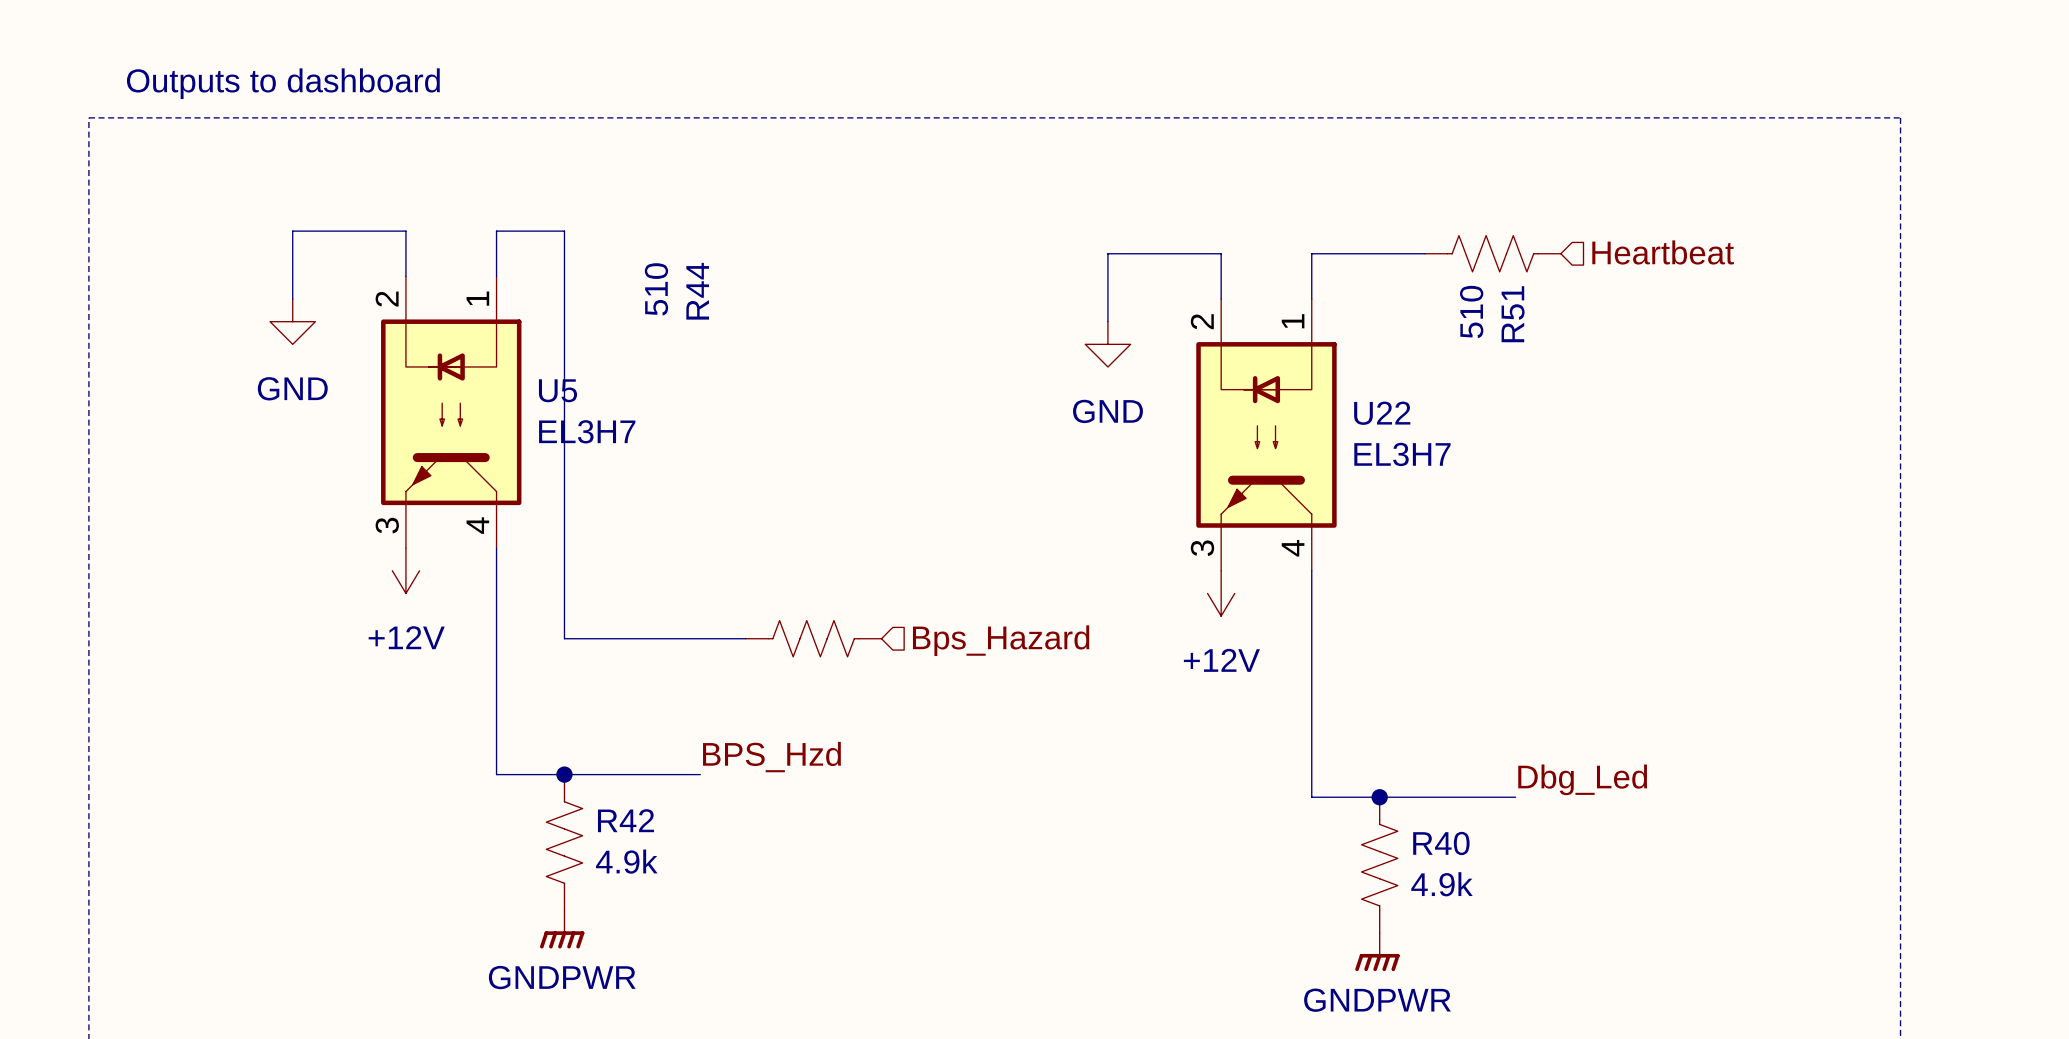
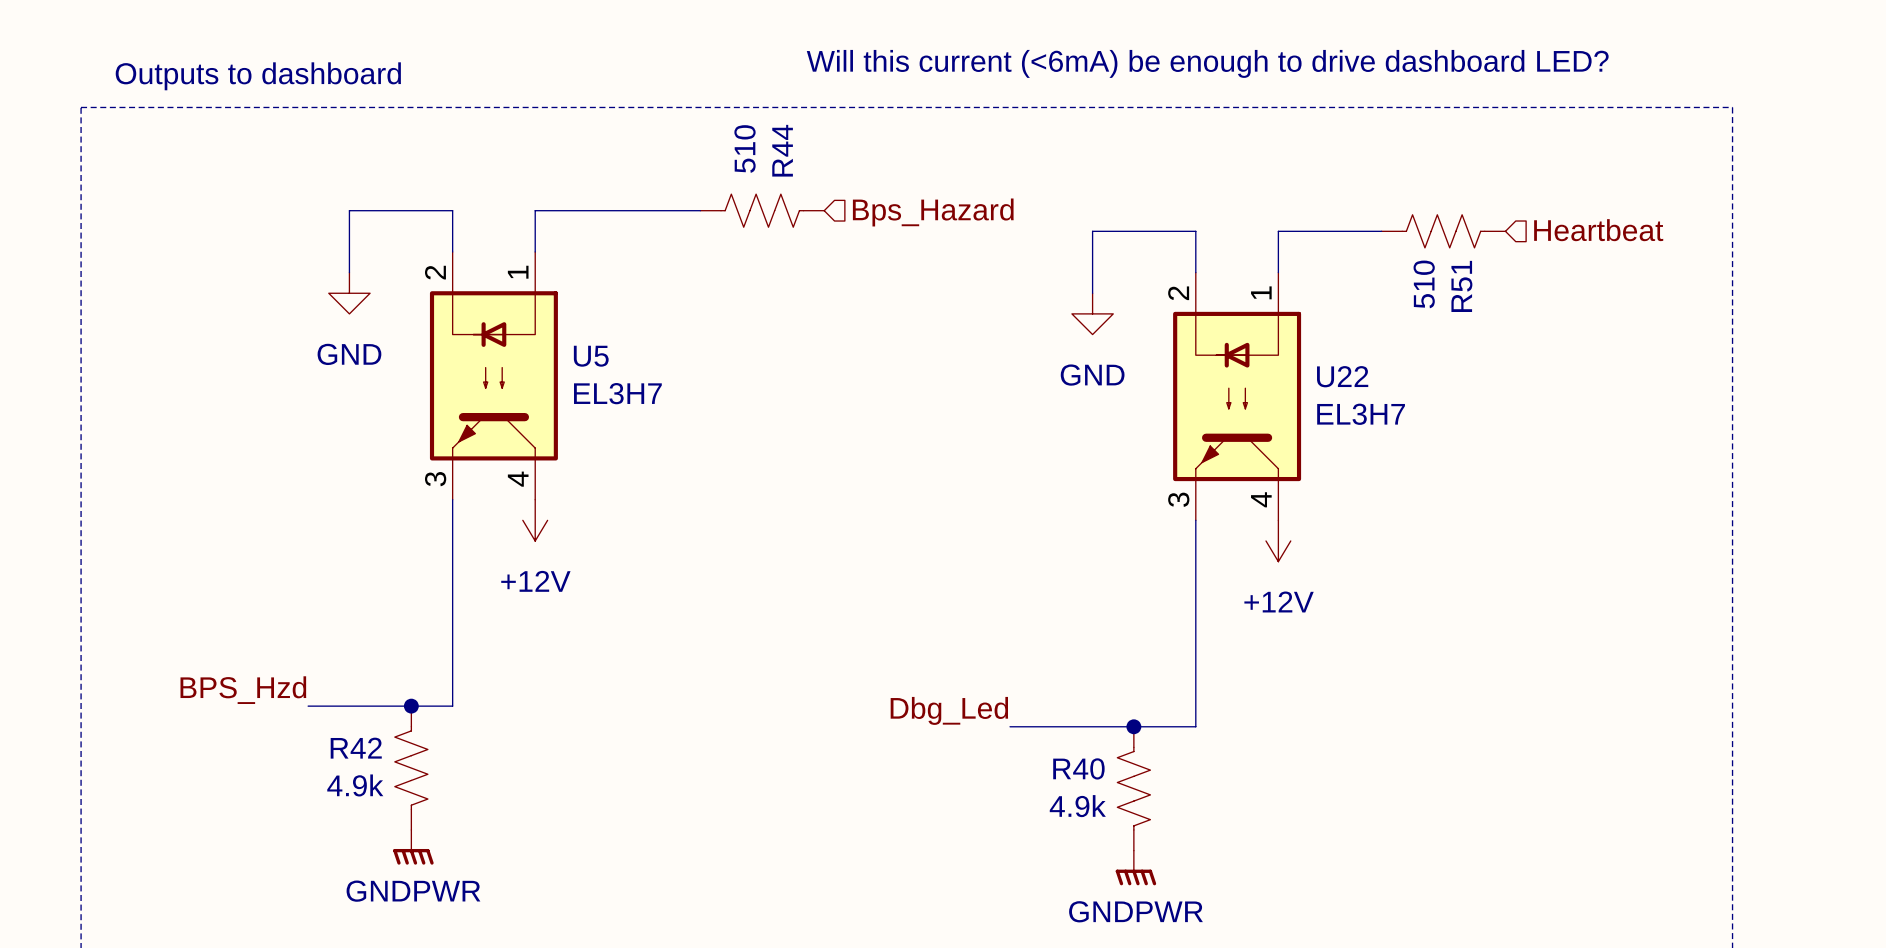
text: none -> Will this current (<6mA) be enough to drive dashboard LED? (1207, 63)
wire: (383, 231) (292, 231) (292, 299) -> (349, 210) (349, 272)
wire: (405, 231) (405, 276) -> (370, 210) (452, 210)
wire: (496, 231) (564, 231) (564, 638) (745, 638) -> none
wire: none -> (700, 210) (535, 210) (535, 251)
hierarchical label position: Heartbeat (1663, 252) -> Heartbeat (1598, 230)
wire: (1198, 253) (1107, 253) (1107, 321) -> (1092, 231) (1092, 293)
wire: (1221, 253) (1221, 299) -> (1113, 231) (1195, 231)
wire: (1311, 253) (1402, 253) -> (1278, 272) (1278, 231)
wire: none -> (1299, 231) (1381, 231)
R51 position: (1492, 253) -> (1443, 231)
R44 value position: 510 (656, 289) -> 510 (745, 149)
R44 name position: R44 (697, 291) -> R44 (782, 150)
power symbol position: GND (292, 321) -> GND (349, 293)
power symbol position: GND (1107, 344) -> GND (1092, 313)
U5 position: (451, 412) -> (493, 375)
U22 position: (1266, 434) -> (1237, 396)
power symbol position: +12V (405, 570) -> +12V (535, 520)
power symbol position: +12V (1221, 593) -> +12V (1278, 540)
R44 position: (813, 638) -> (762, 210)
hierarchical label position: Bps_Hazard (1001, 640) -> Bps_Hazard (933, 212)
label position: BPS_Hzd (771, 757) -> BPS_Hzd (243, 690)
junction: none -> (411, 706)
wire: (496, 774) (700, 774) -> (452, 706) (308, 706)
junction: (564, 774) -> none
label position: Dbg_Led (1582, 779) -> Dbg_Led (949, 710)
junction: none -> (1133, 726)
wire: (1311, 797) (1515, 797) -> (1195, 726) (1010, 726)
junction: (1379, 797) -> none
R42 flip: as is (564, 842) -> left-right (411, 768)
R42 position: (564, 842) -> (411, 768)
R40 flip: as is (1379, 865) -> left-right (1133, 788)
R40 position: (1379, 865) -> (1133, 788)
power symbol: none -> GNDPWR (413, 847)
power symbol: GNDPWR (562, 929) -> none
power symbol: none -> GNDPWR (1135, 867)
power symbol: GNDPWR (1377, 952) -> none

